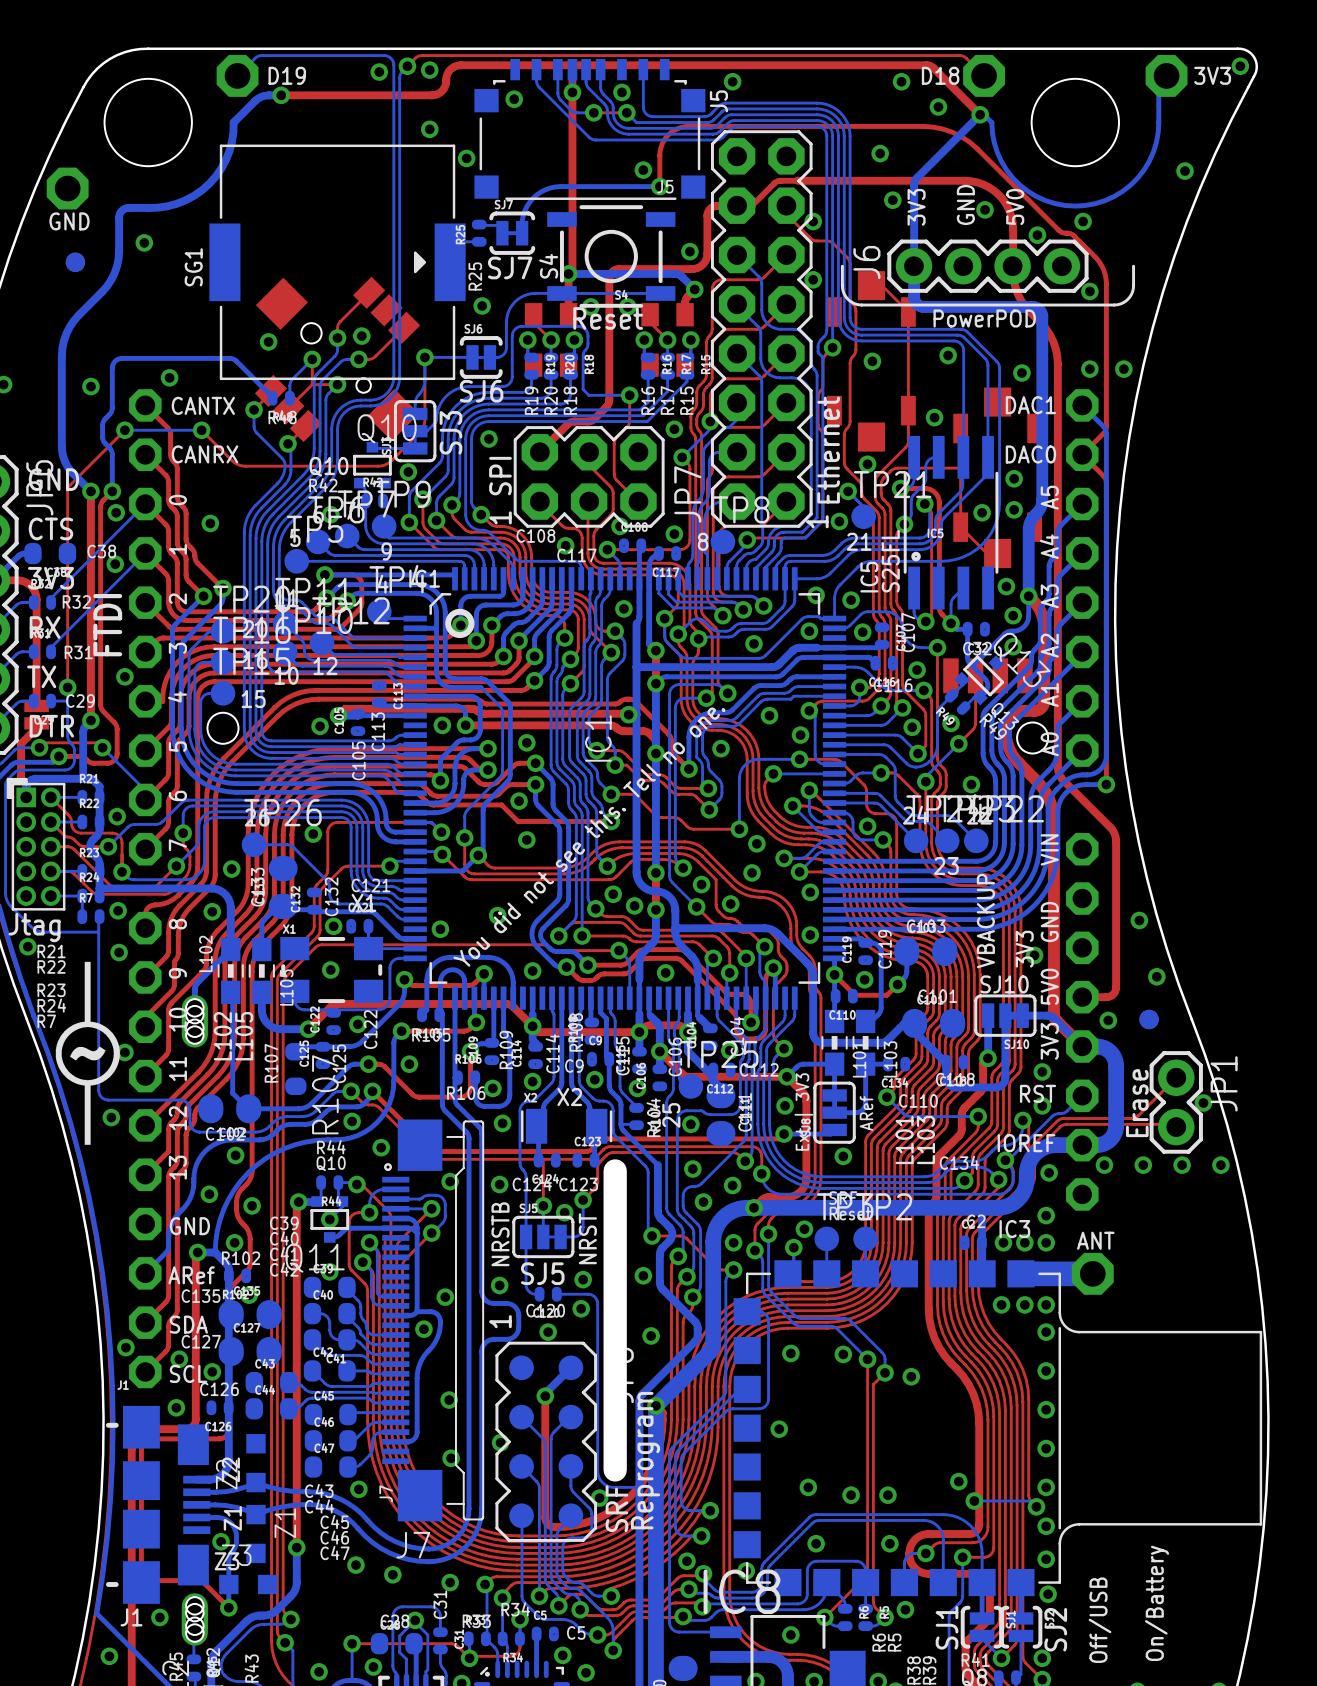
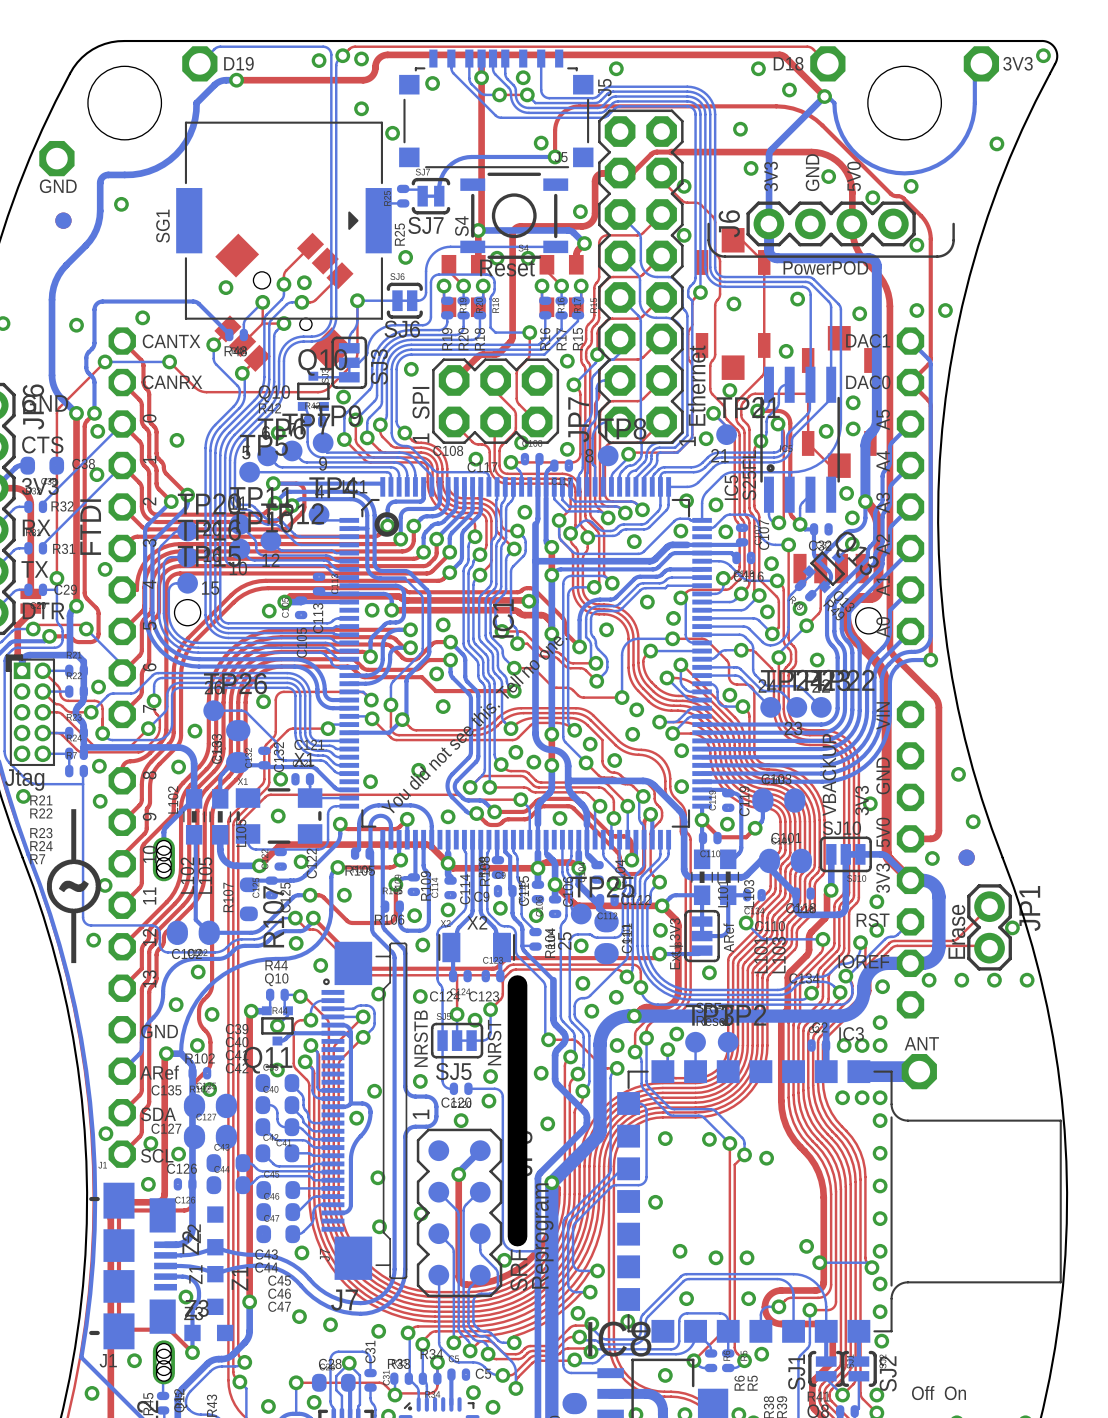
text: On/Battery (1157, 1603) -> none
text: Off/USB (1099, 1620) -> none
text: none -> Off On (938, 1393)

